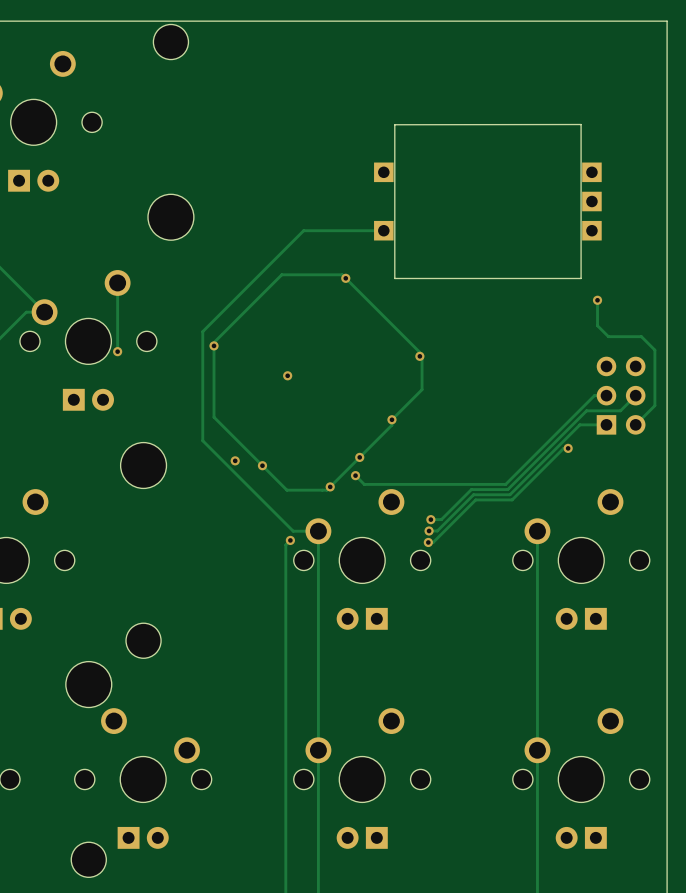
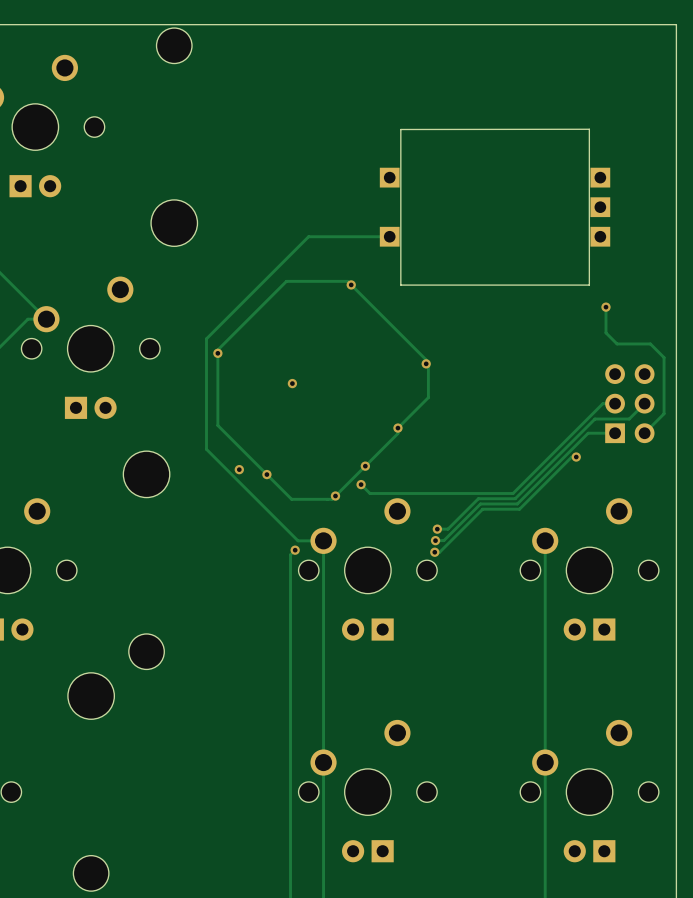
track: (117, 282) (117, 351) -> none
via: (117, 351) -> none
part: (143, 778) -> none

